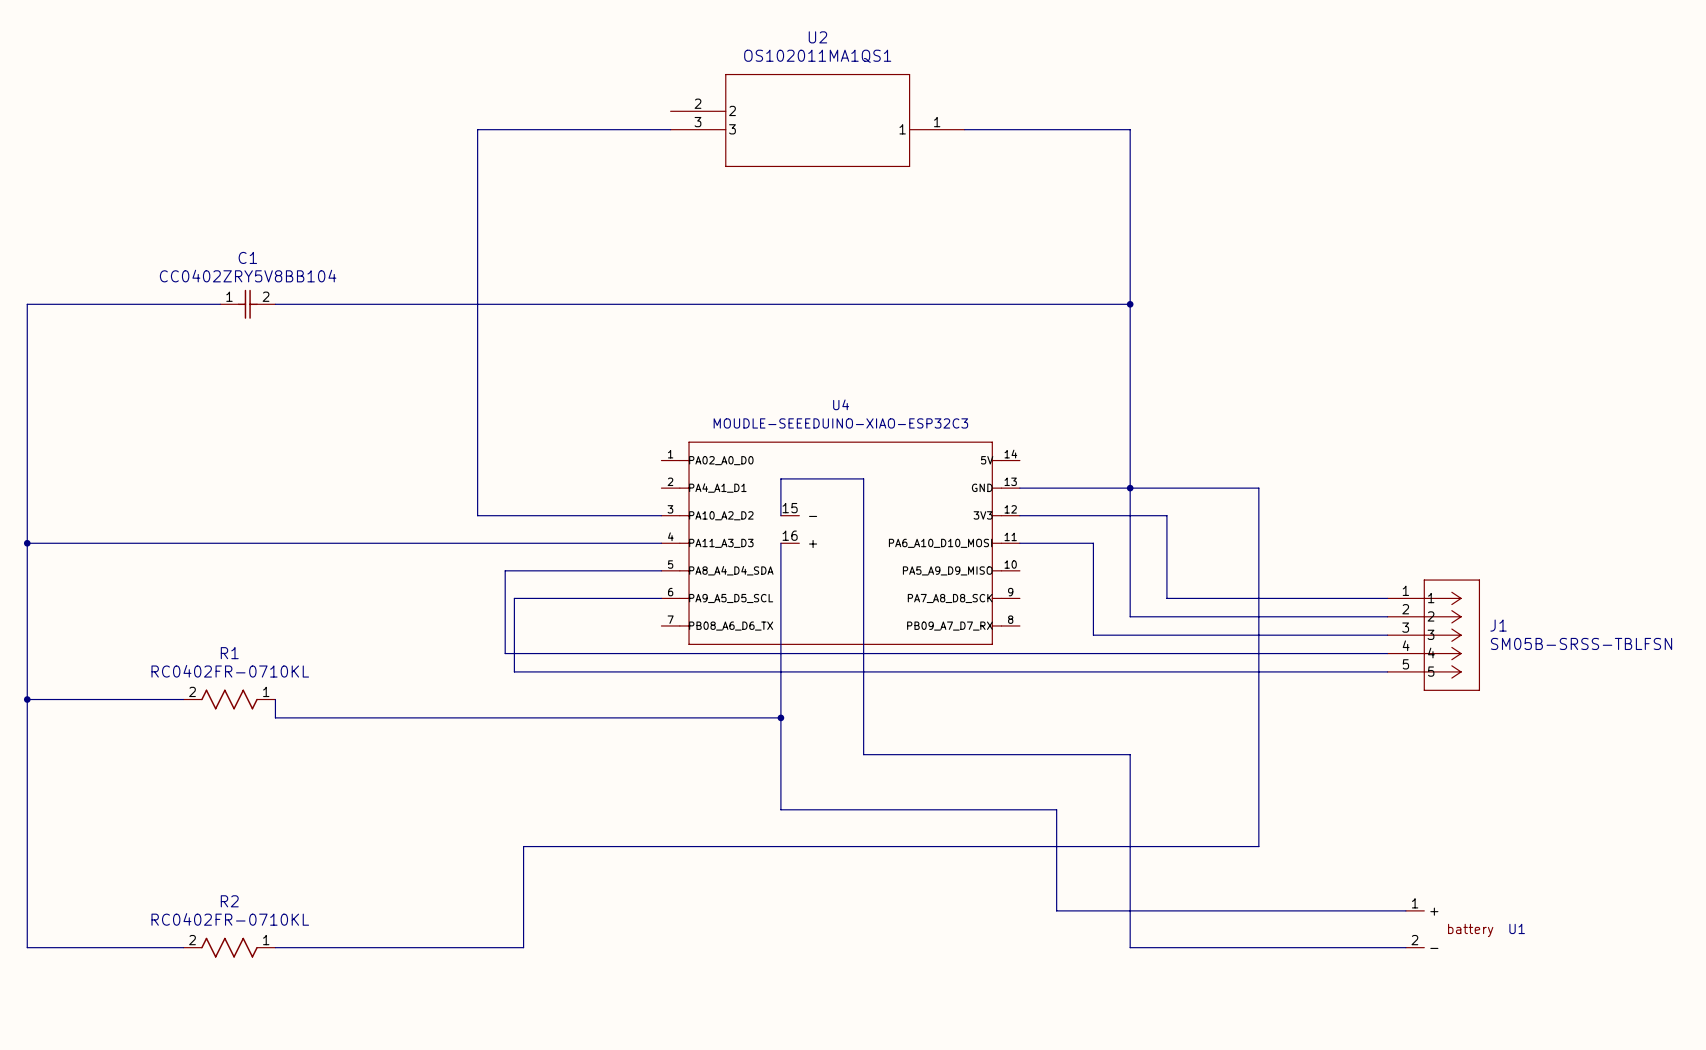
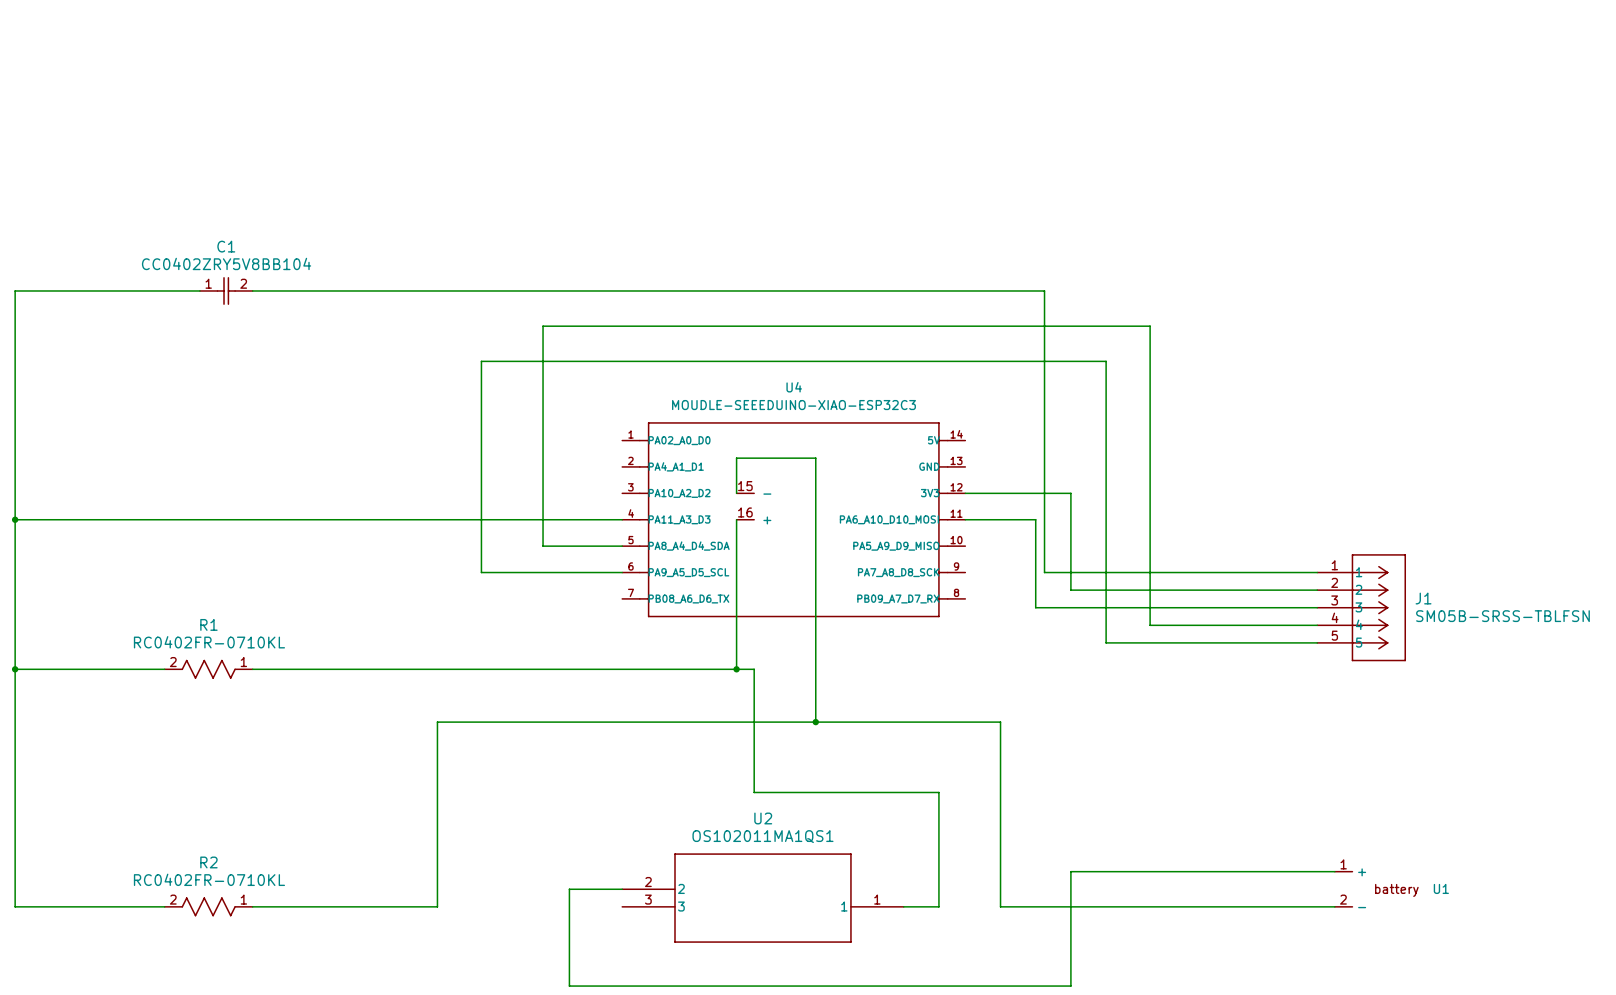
U2 position: (817, 120) -> (762, 898)
wire: (670, 129) (477, 129) (477, 515) (661, 515) -> none
wire: (964, 129) (1130, 129) (1130, 515) (1166, 515) -> none
wire: (1102, 304) (1130, 304) -> (1044, 290) (1044, 572) (1106, 572) (1106, 642)
junction: (1130, 304) -> none
wire: (1019, 488) (1258, 488) (1258, 846) (523, 846) (523, 947) (468, 947) -> (815, 722) (437, 722) (437, 906)
junction: (1130, 488) -> none
wire: (578, 570) (505, 570) (505, 653) (1212, 653) -> (543, 546) (543, 326) (1150, 326) (1150, 625)
wire: (514, 598) (514, 671) (1166, 671) -> (481, 572) (481, 361) (1106, 361) (1106, 493)
wire: (275, 699) (275, 717) (780, 717) -> (252, 669) (754, 669) (754, 792) (938, 792) (938, 906) (903, 906)
wire: (780, 699) (780, 809) (1056, 809) -> none
junction position: (780, 717) -> (736, 669)
junction: none -> (815, 722)
wire: (1056, 754) (1130, 754) (1130, 910) (1056, 910) -> (1000, 722) (1000, 774)
wire: none -> (1000, 871) (1000, 906) (1070, 906) (1070, 986) (569, 986) (569, 889) (622, 889)

